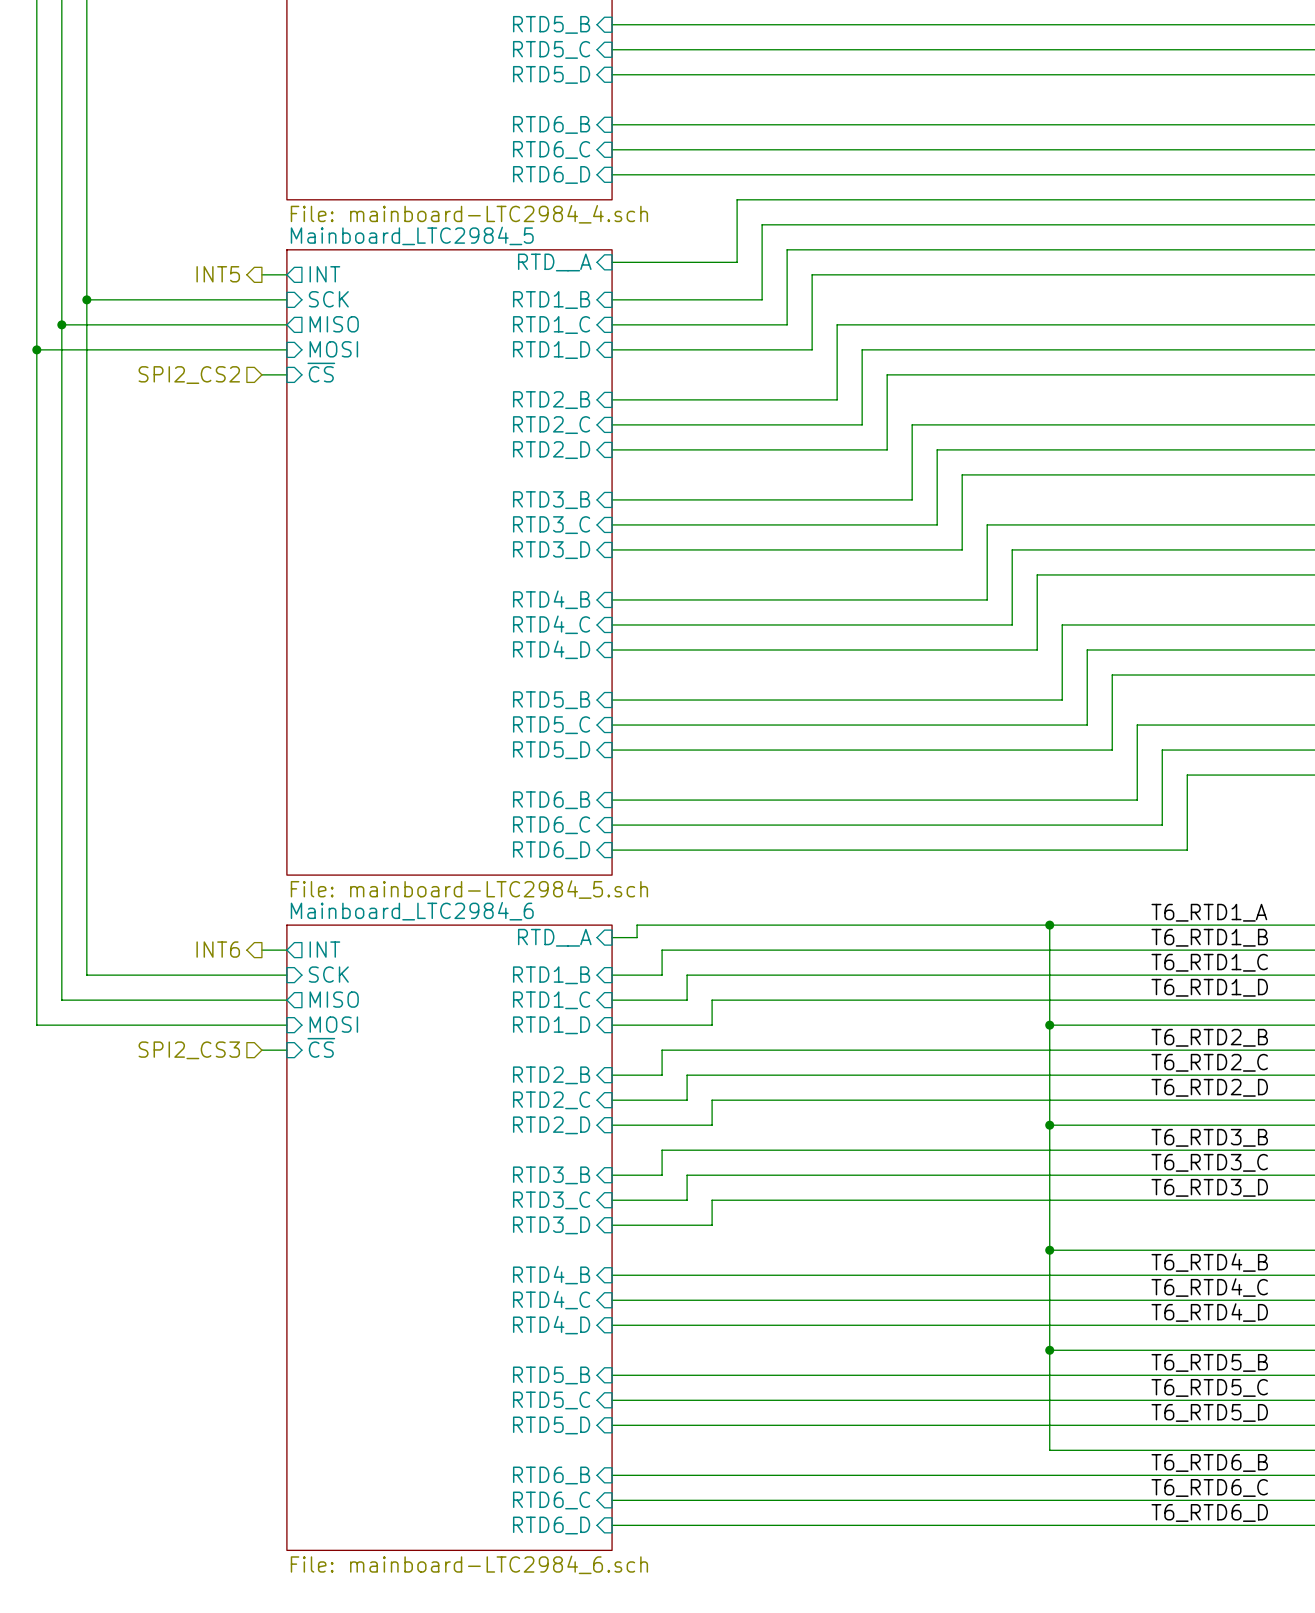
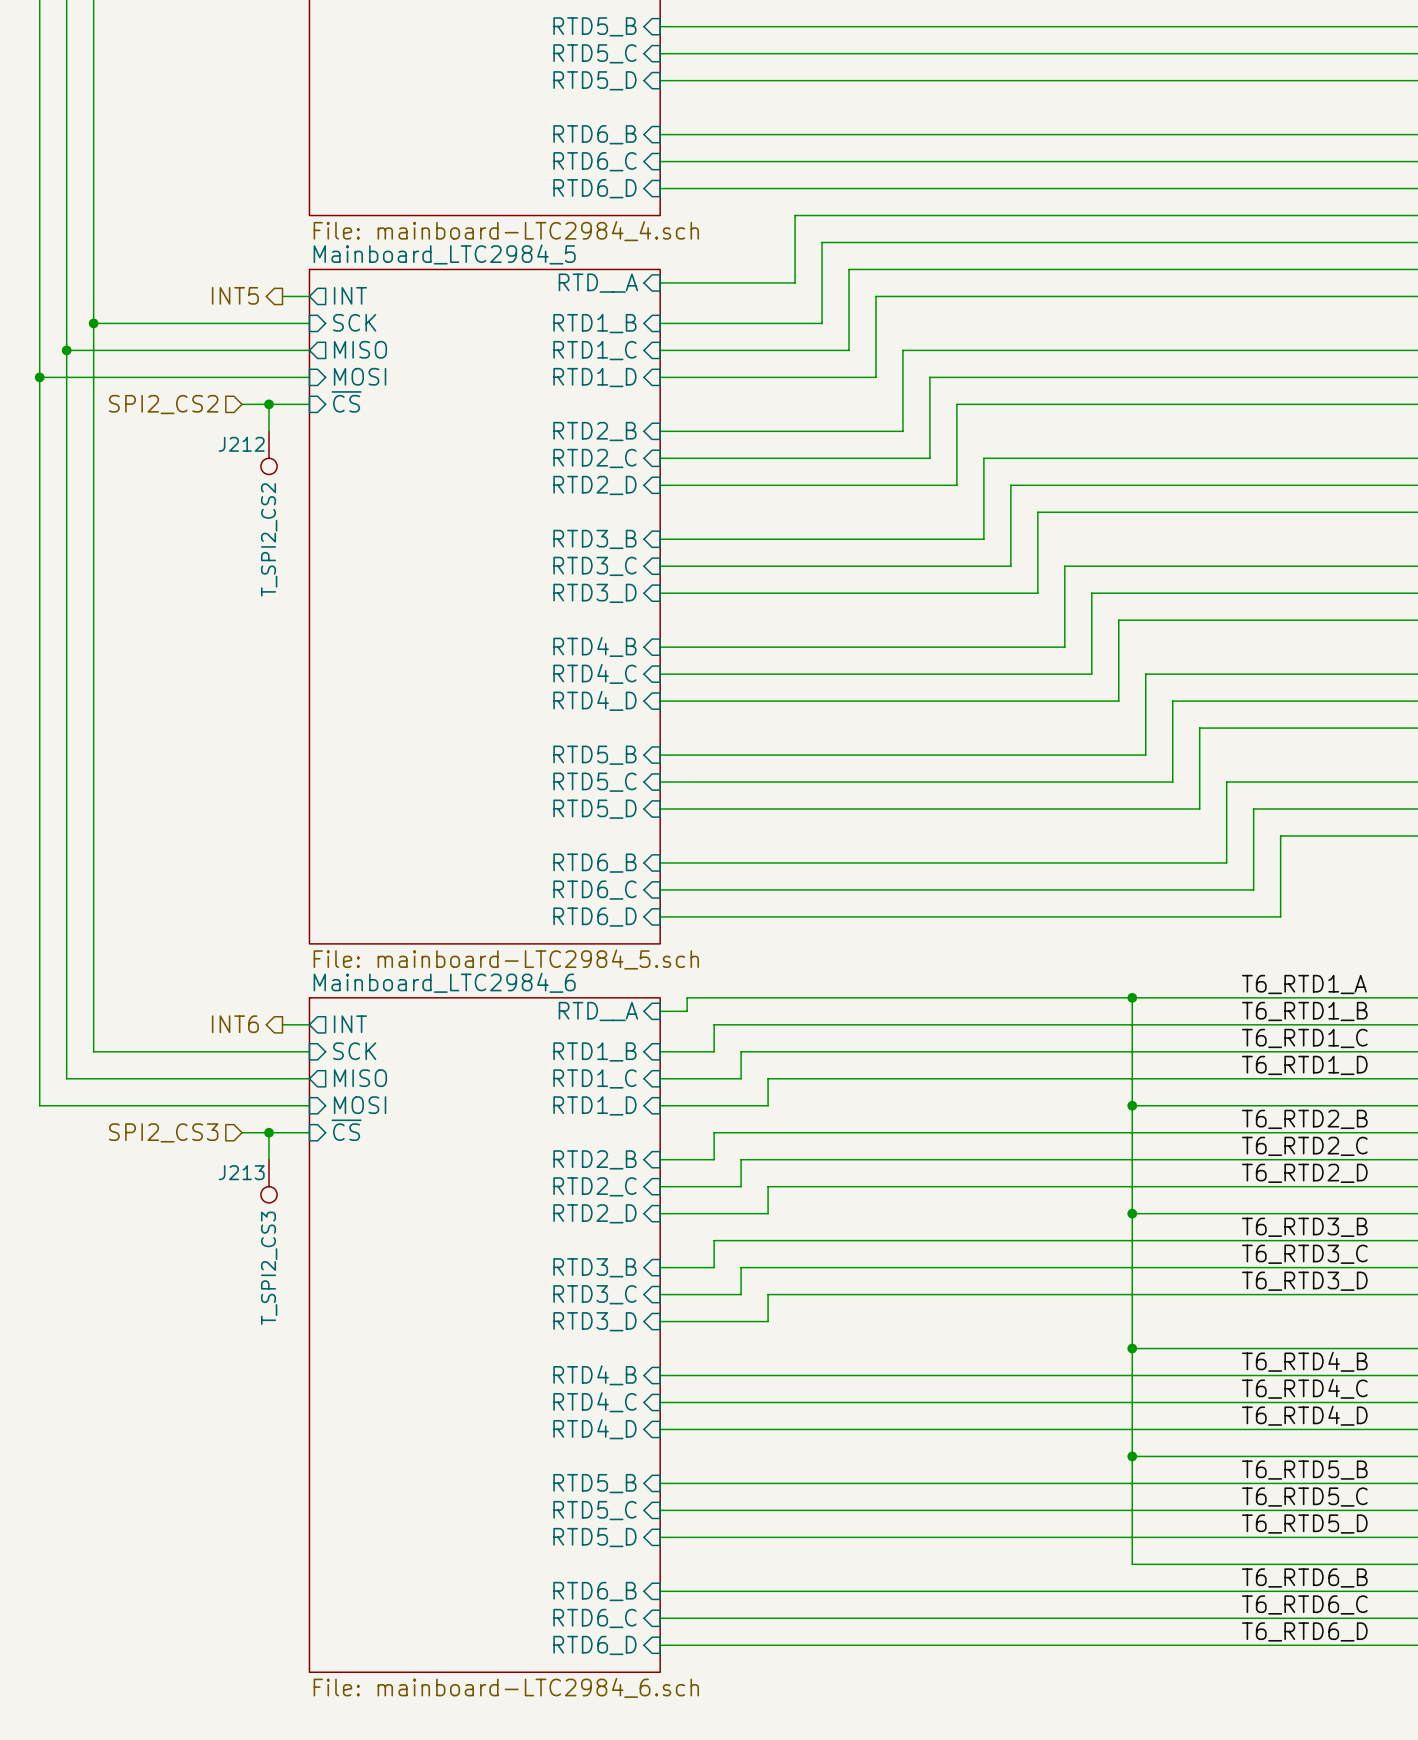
wire: none -> (242, 404) (282, 404)
wire: none -> (269, 404) (269, 431)
junction: none -> (269, 404)
hierarchical label position: SPI2_CS2 (189, 375) -> SPI2_CS2 (163, 404)
J212: none -> T_SPI2_CS2 (269, 452)
hierarchical label position: SPI2_CS3 (189, 1050) -> SPI2_CS3 (163, 1132)
wire: none -> (242, 1132) (282, 1132)
wire: none -> (269, 1132) (269, 1159)
junction: none -> (269, 1132)
J213: none -> T_SPI2_CS3 (269, 1181)

